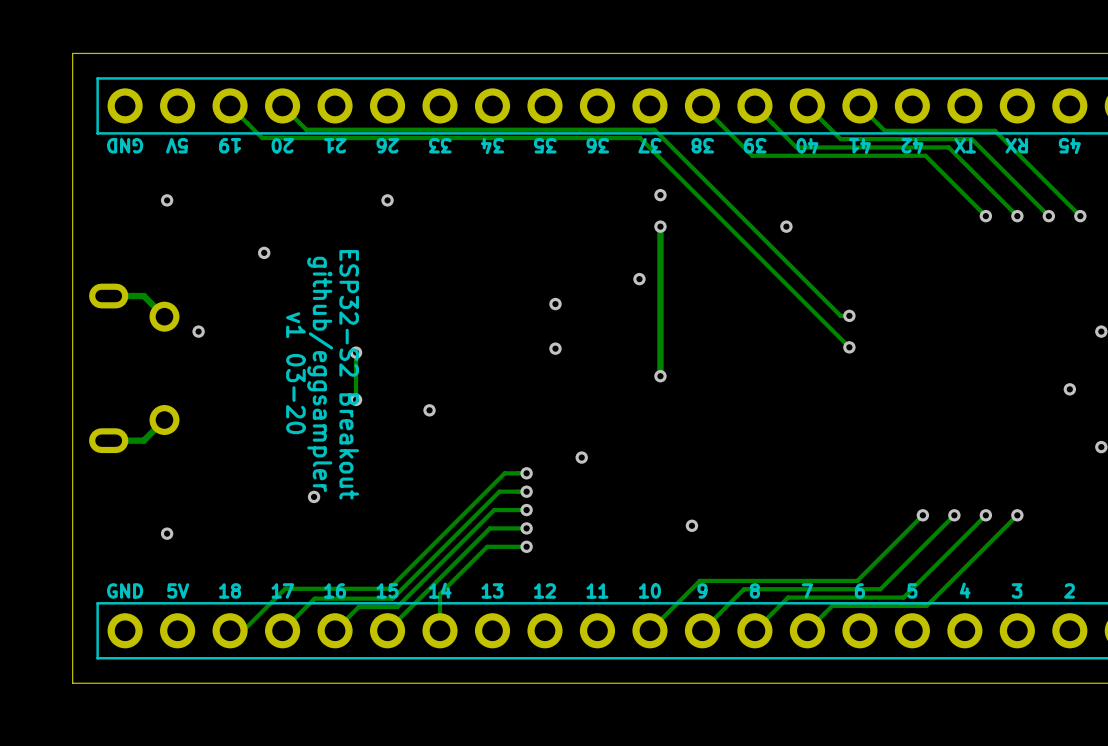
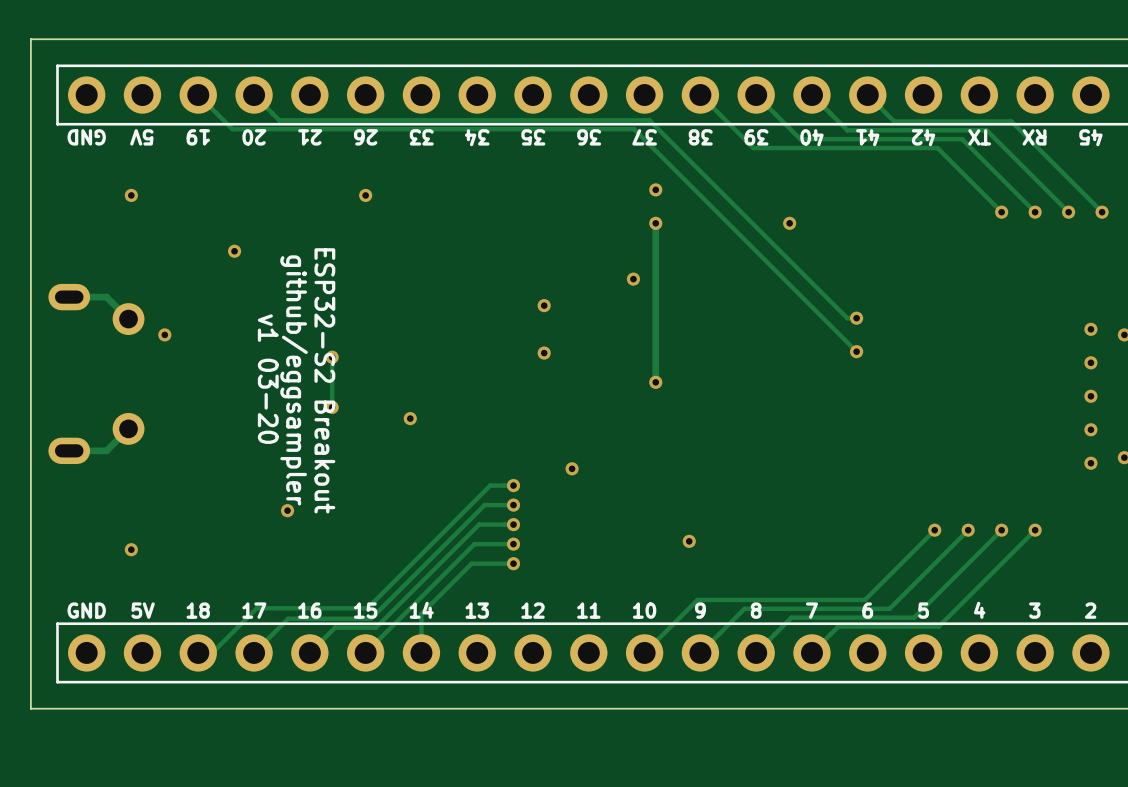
via: none -> (1090, 329)
via: none -> (1090, 362)
via: none -> (1090, 429)
via: none -> (1090, 463)

